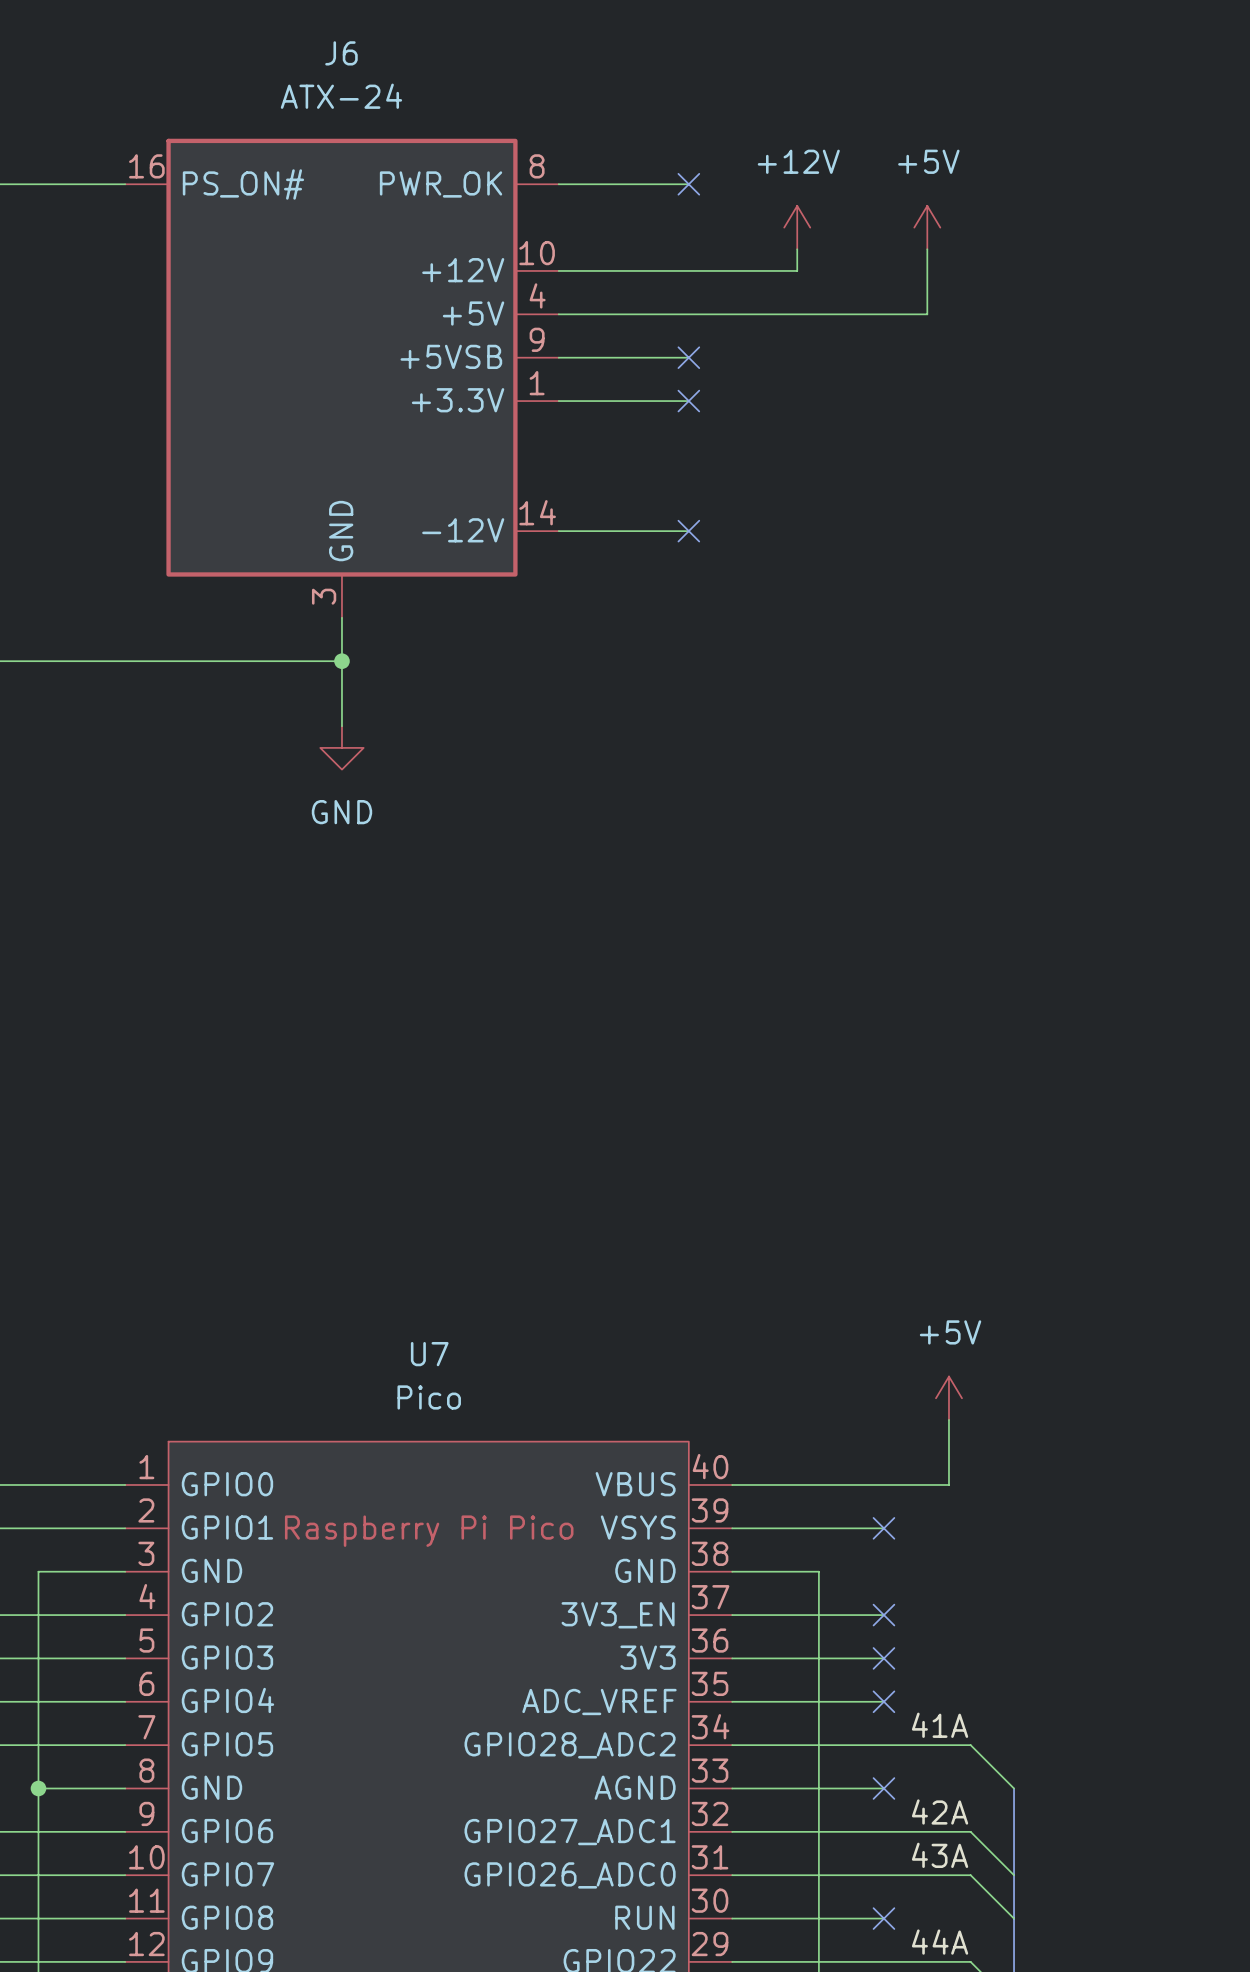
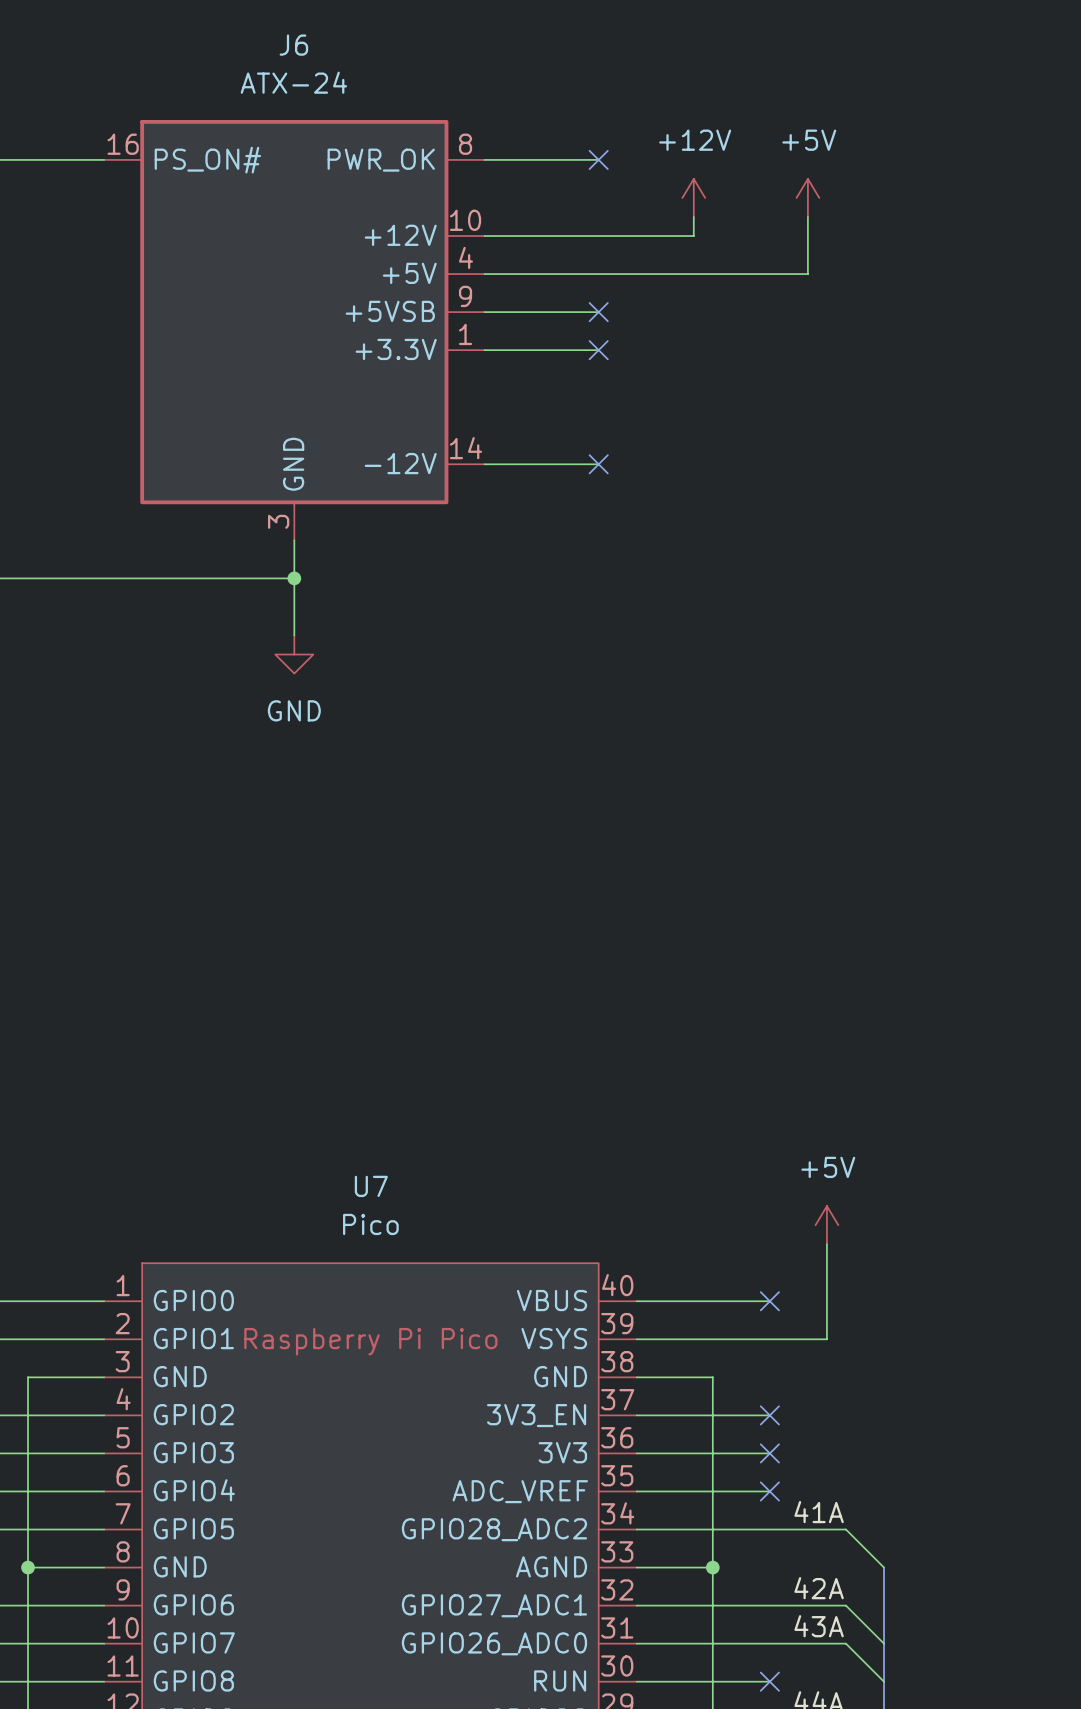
wire: (883, 1484) (948, 1484) -> (769, 1339) (826, 1339) (826, 1301)
no-connect mark position: (883, 1528) -> (769, 1301)
wire: (818, 1788) (883, 1788) -> none
junction: none -> (712, 1567)
no-connect mark: (883, 1788) -> none

